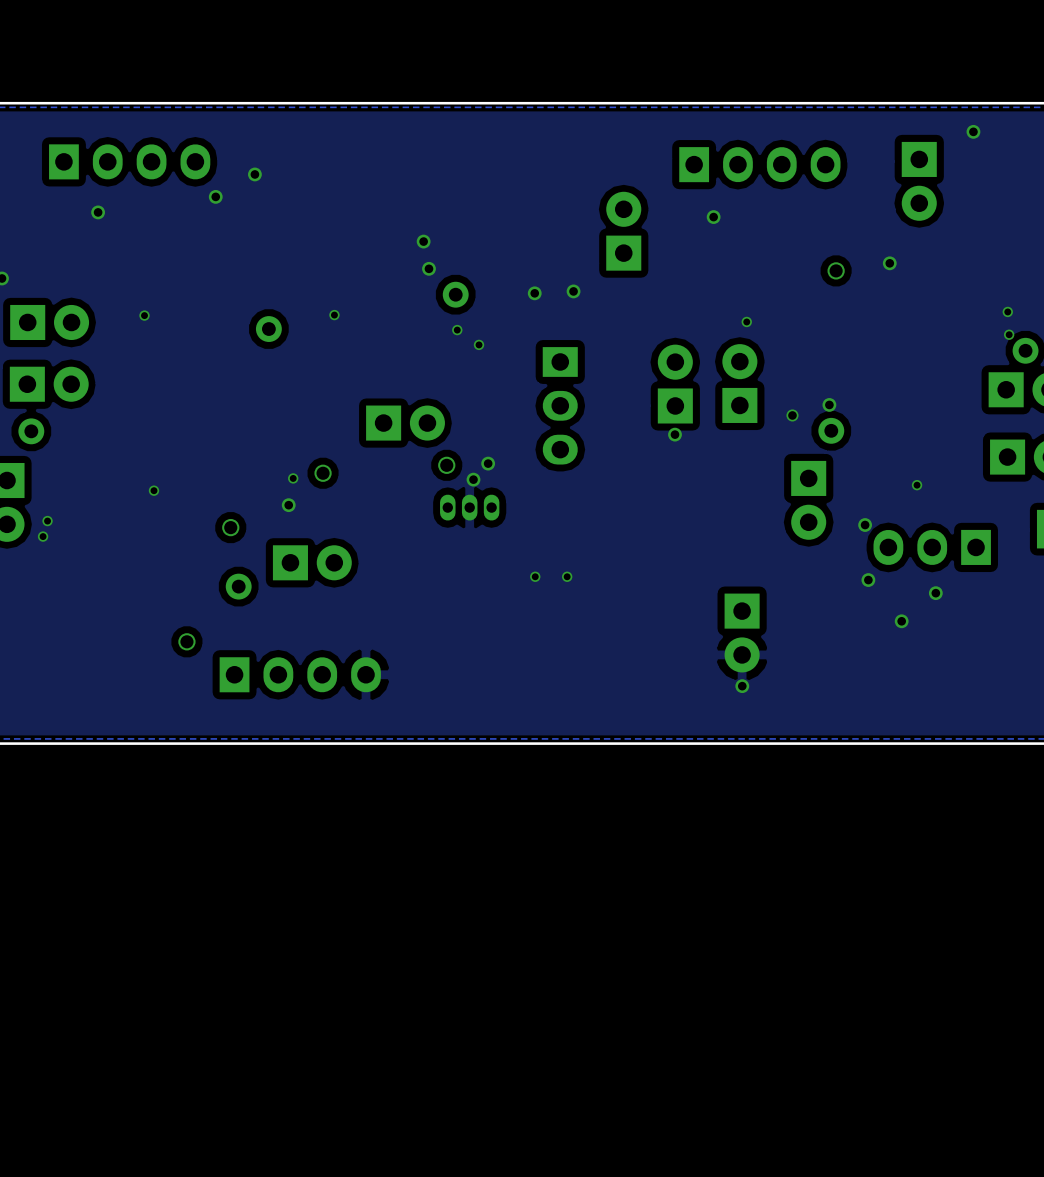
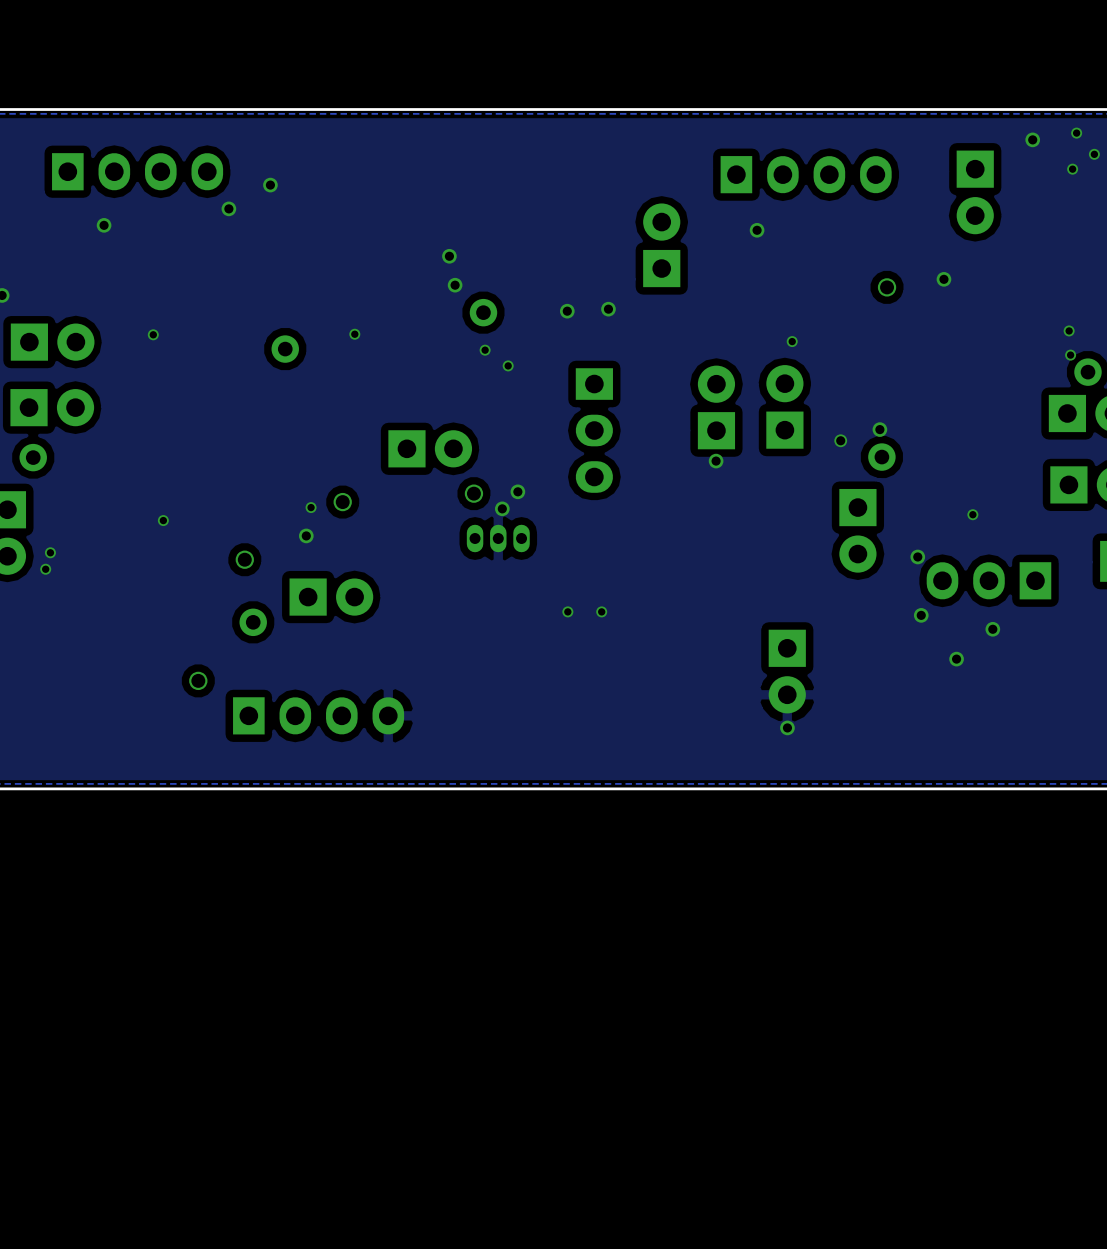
via: none -> (1076, 133)
via: none -> (1094, 154)
via: none -> (1072, 169)

